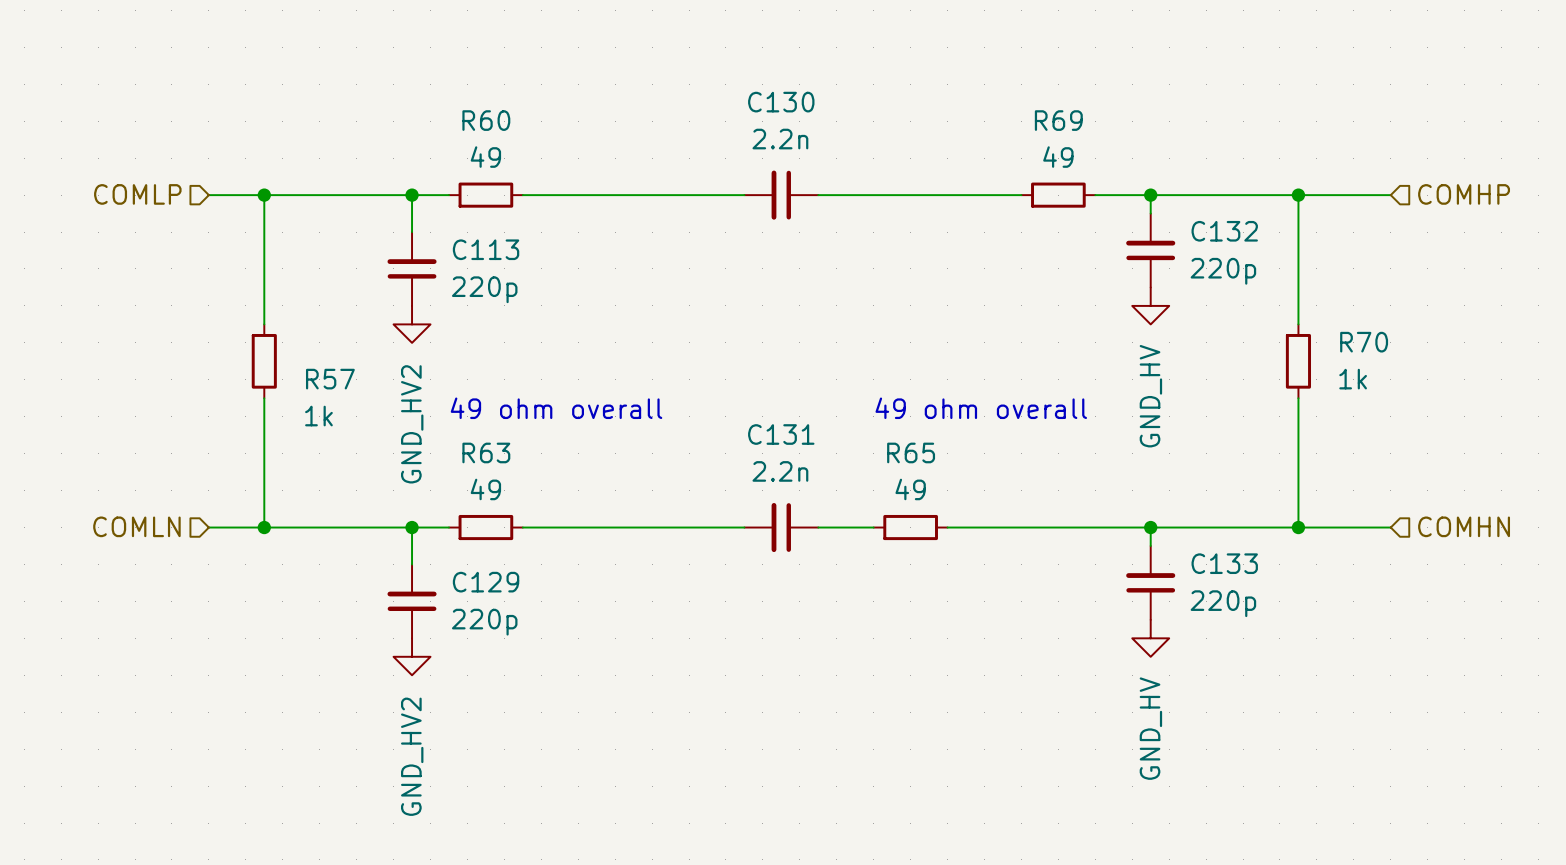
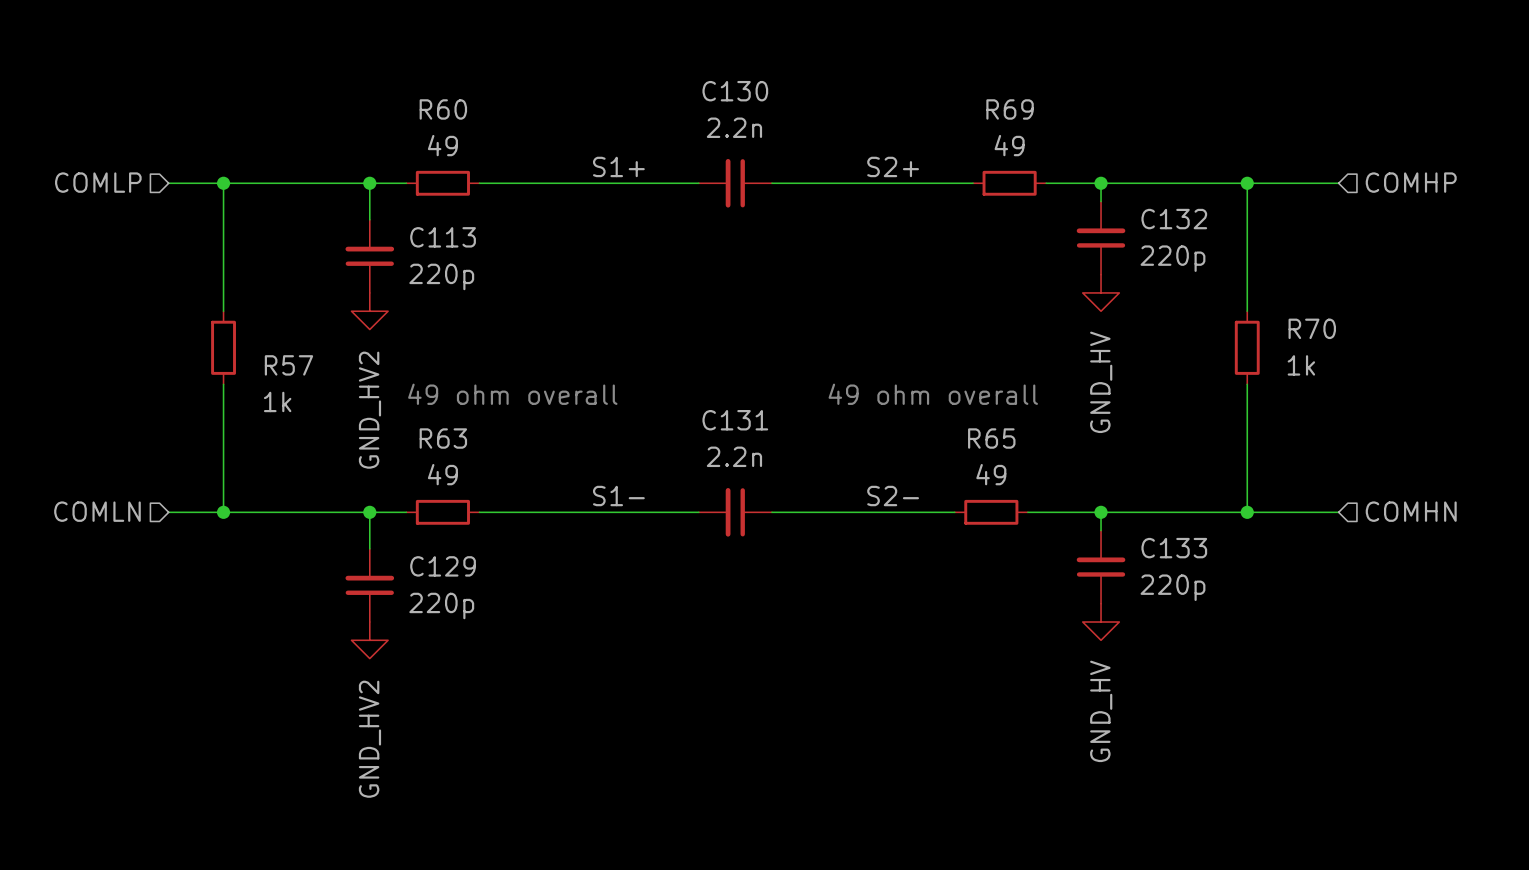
label: none -> S1+ (618, 166)
label: none -> S2+ (893, 166)
label: none -> S1- (618, 496)
label: none -> S2- (893, 496)
R65 position: (910, 527) -> (991, 512)
wire: (1002, 527) (1076, 527) -> (826, 512) (899, 512)

